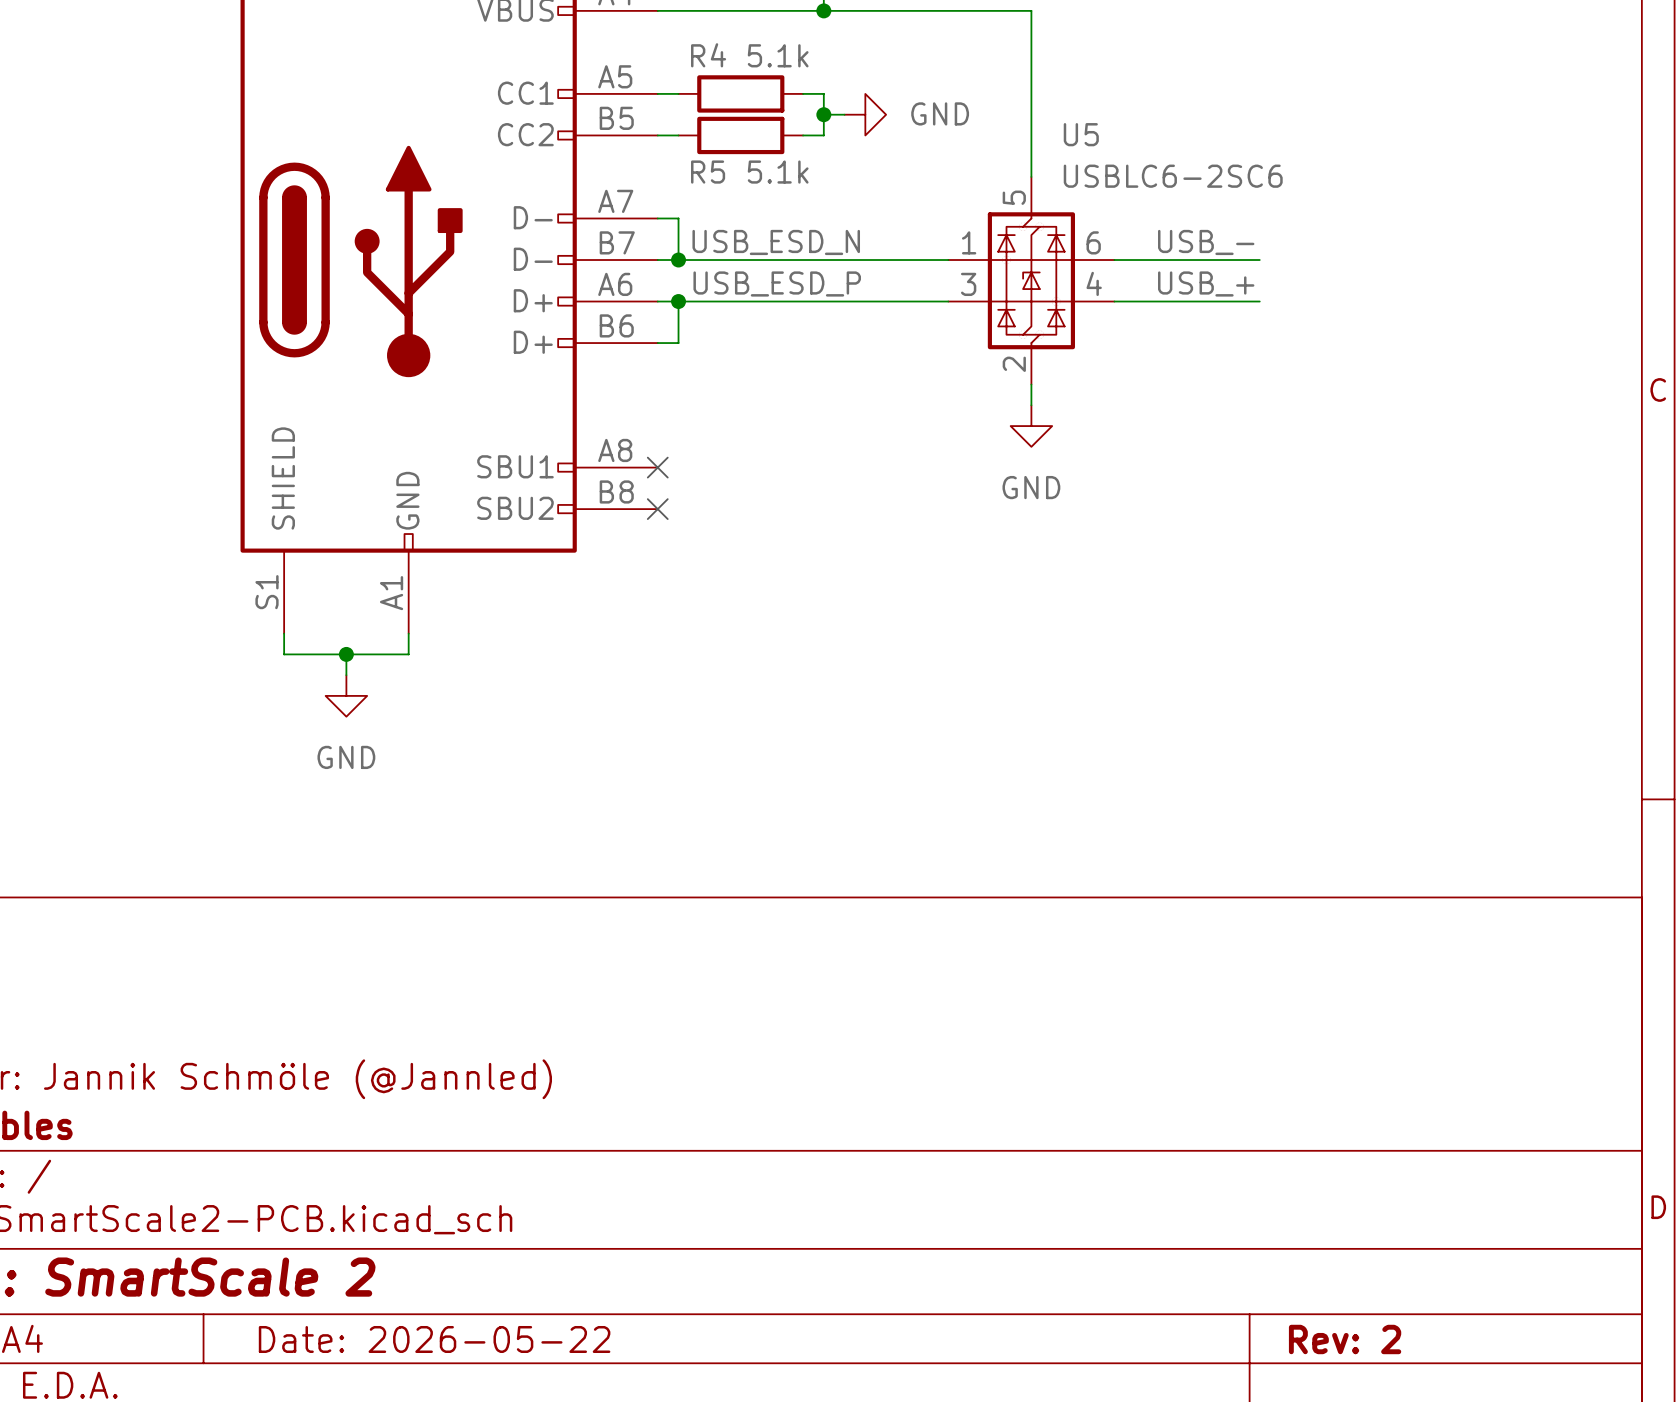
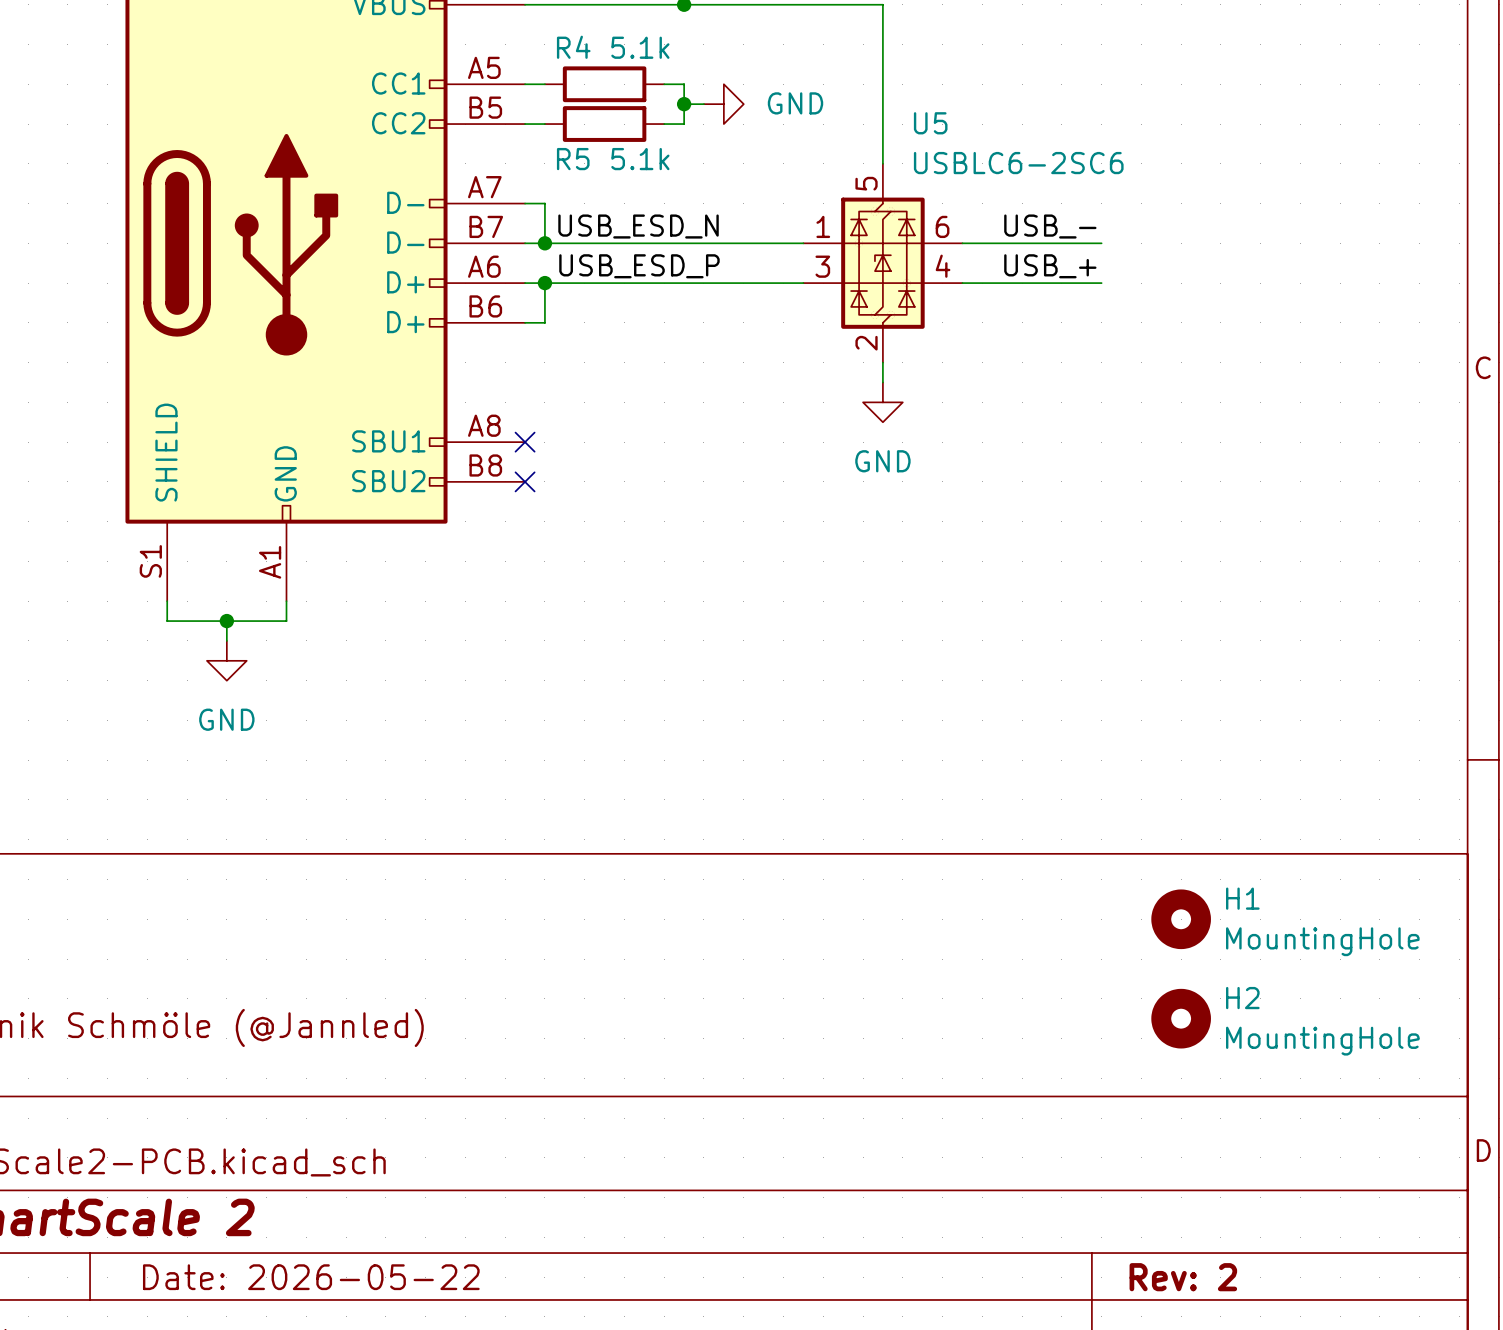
H1: none -> MountingHole (1181, 919)
H2: none -> MountingHole (1181, 1018)

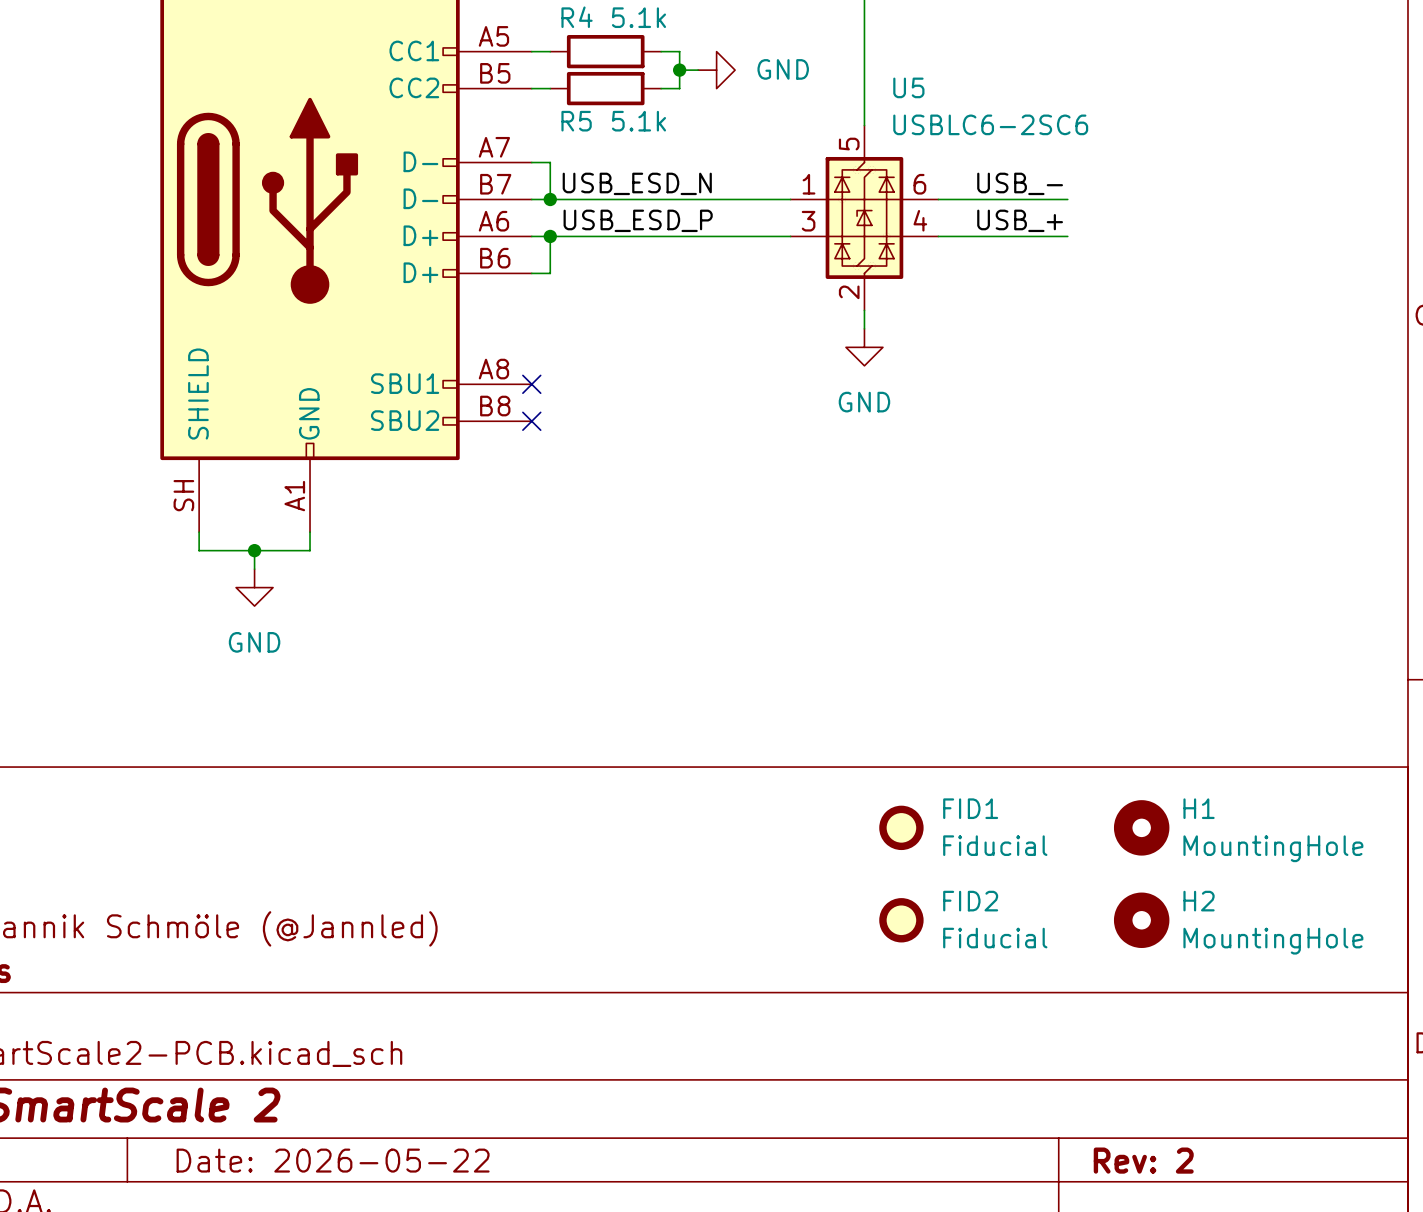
part pin number: S1 (150, 561) -> SH (183, 495)
FID1: none -> Fiducial (901, 827)
FID2: none -> Fiducial (901, 920)

